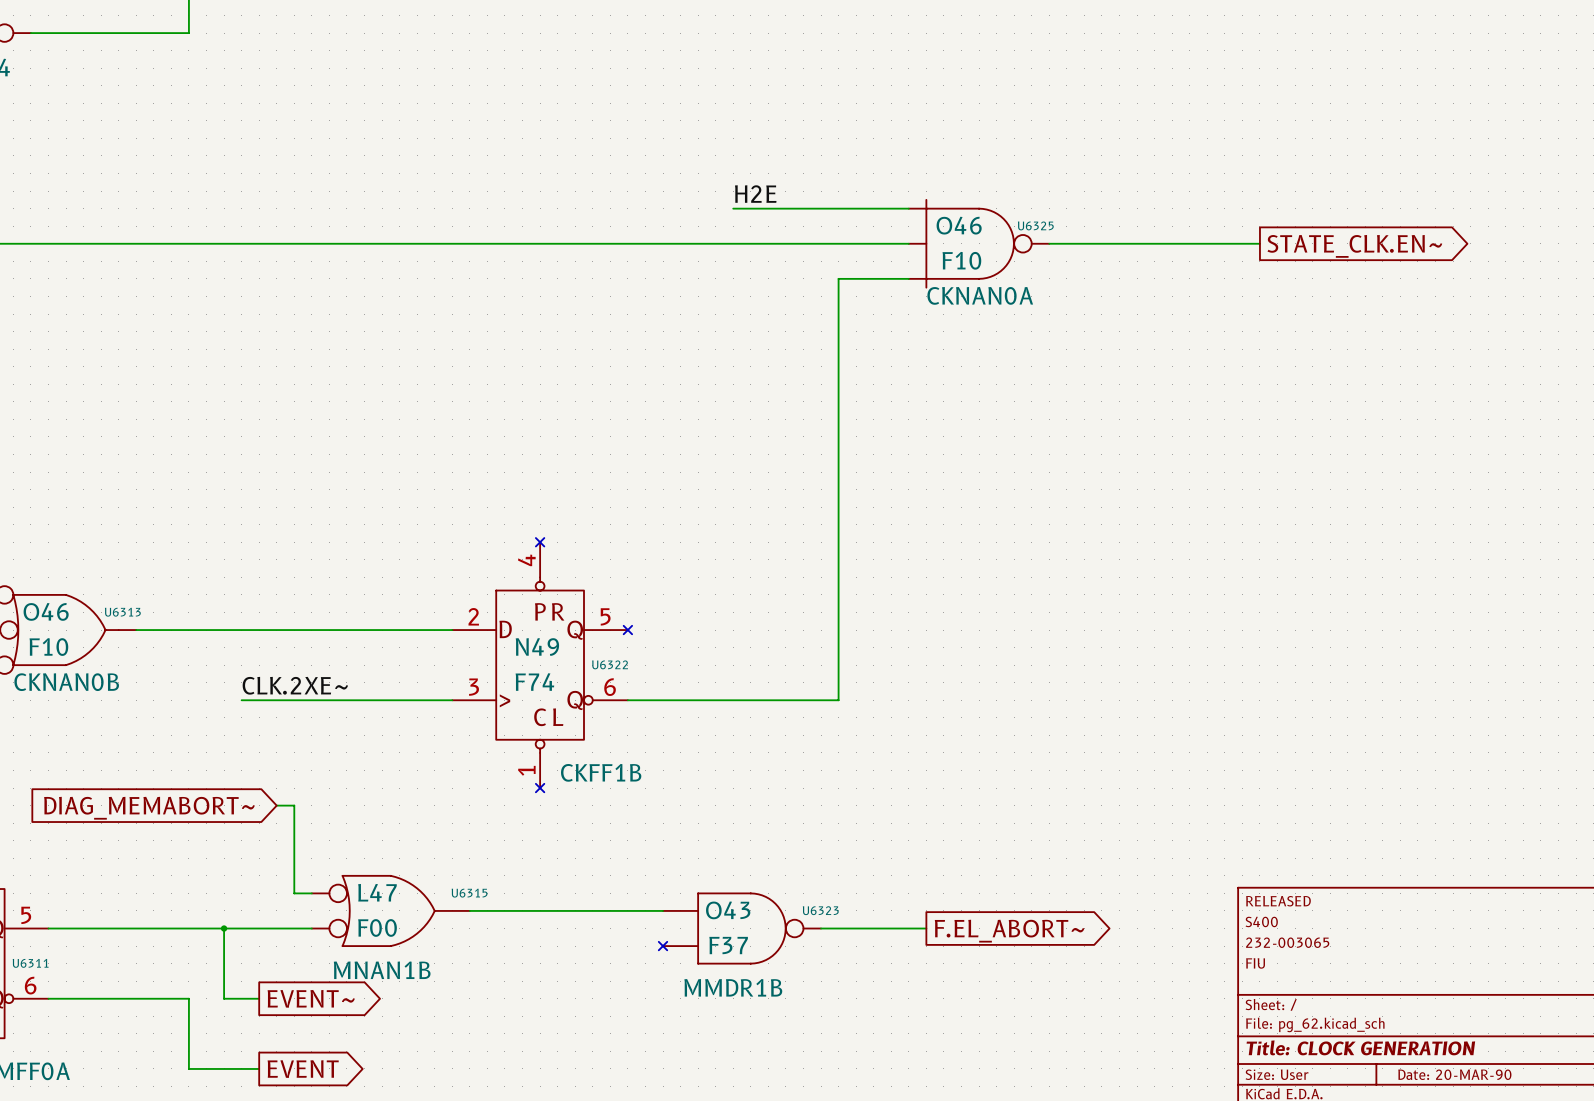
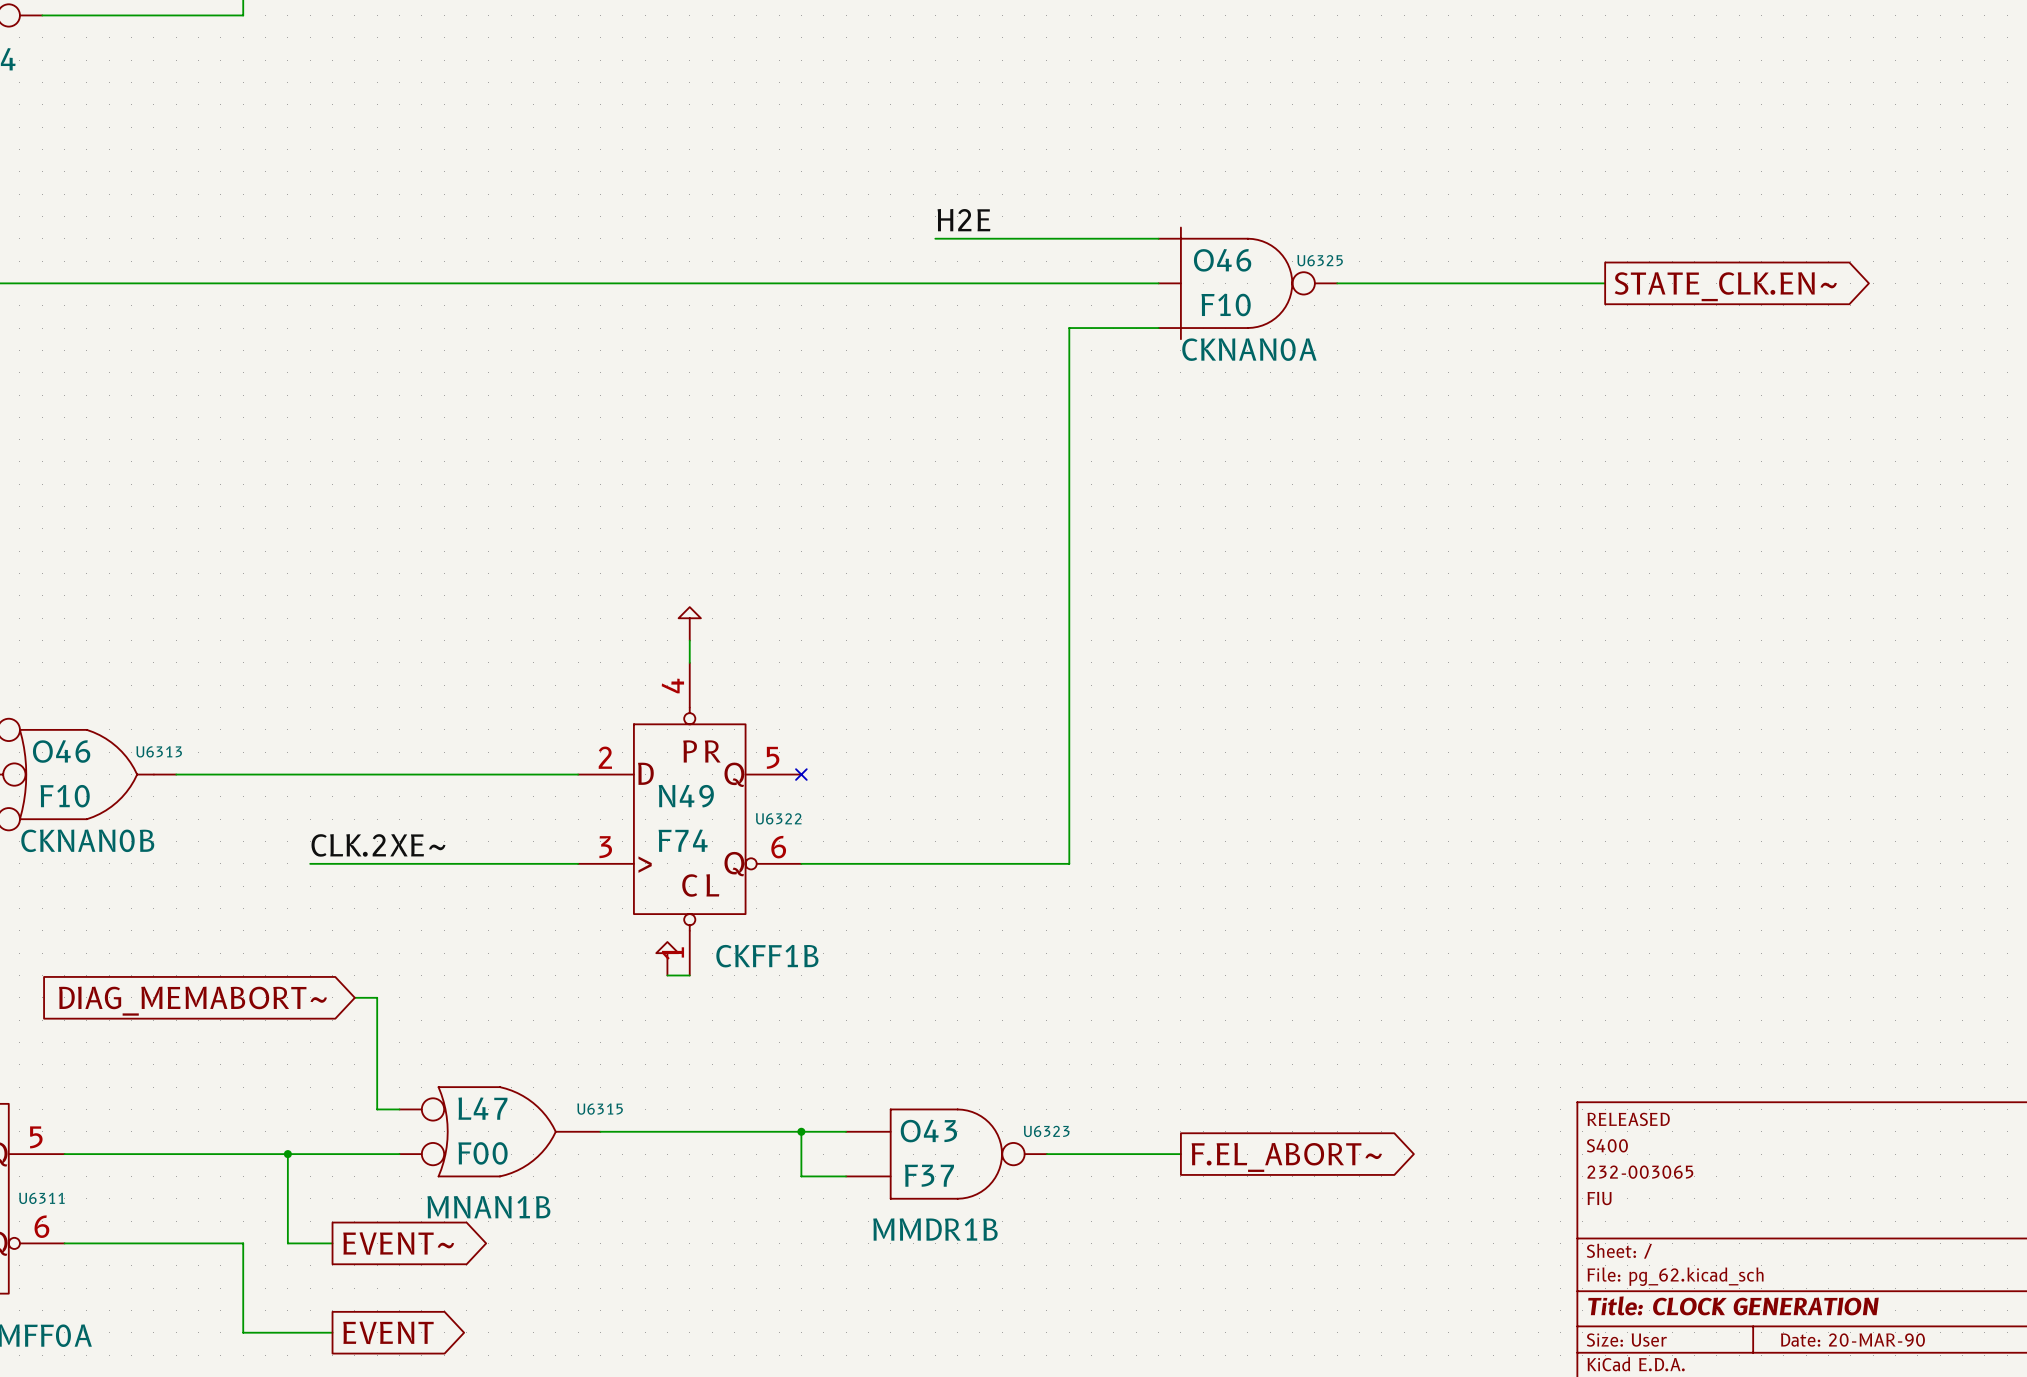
power symbol: none -> (689, 623)
wire: none -> (689, 640) (689, 662)
no-connect mark: (540, 542) -> none
power symbol: none -> (667, 958)
wire: none -> (667, 975) (689, 975)
no-connect mark: (540, 788) -> none
wire: none -> (801, 1131) (801, 1176) (846, 1176)
junction: none -> (801, 1131)
no-connect mark: (663, 946) -> none

